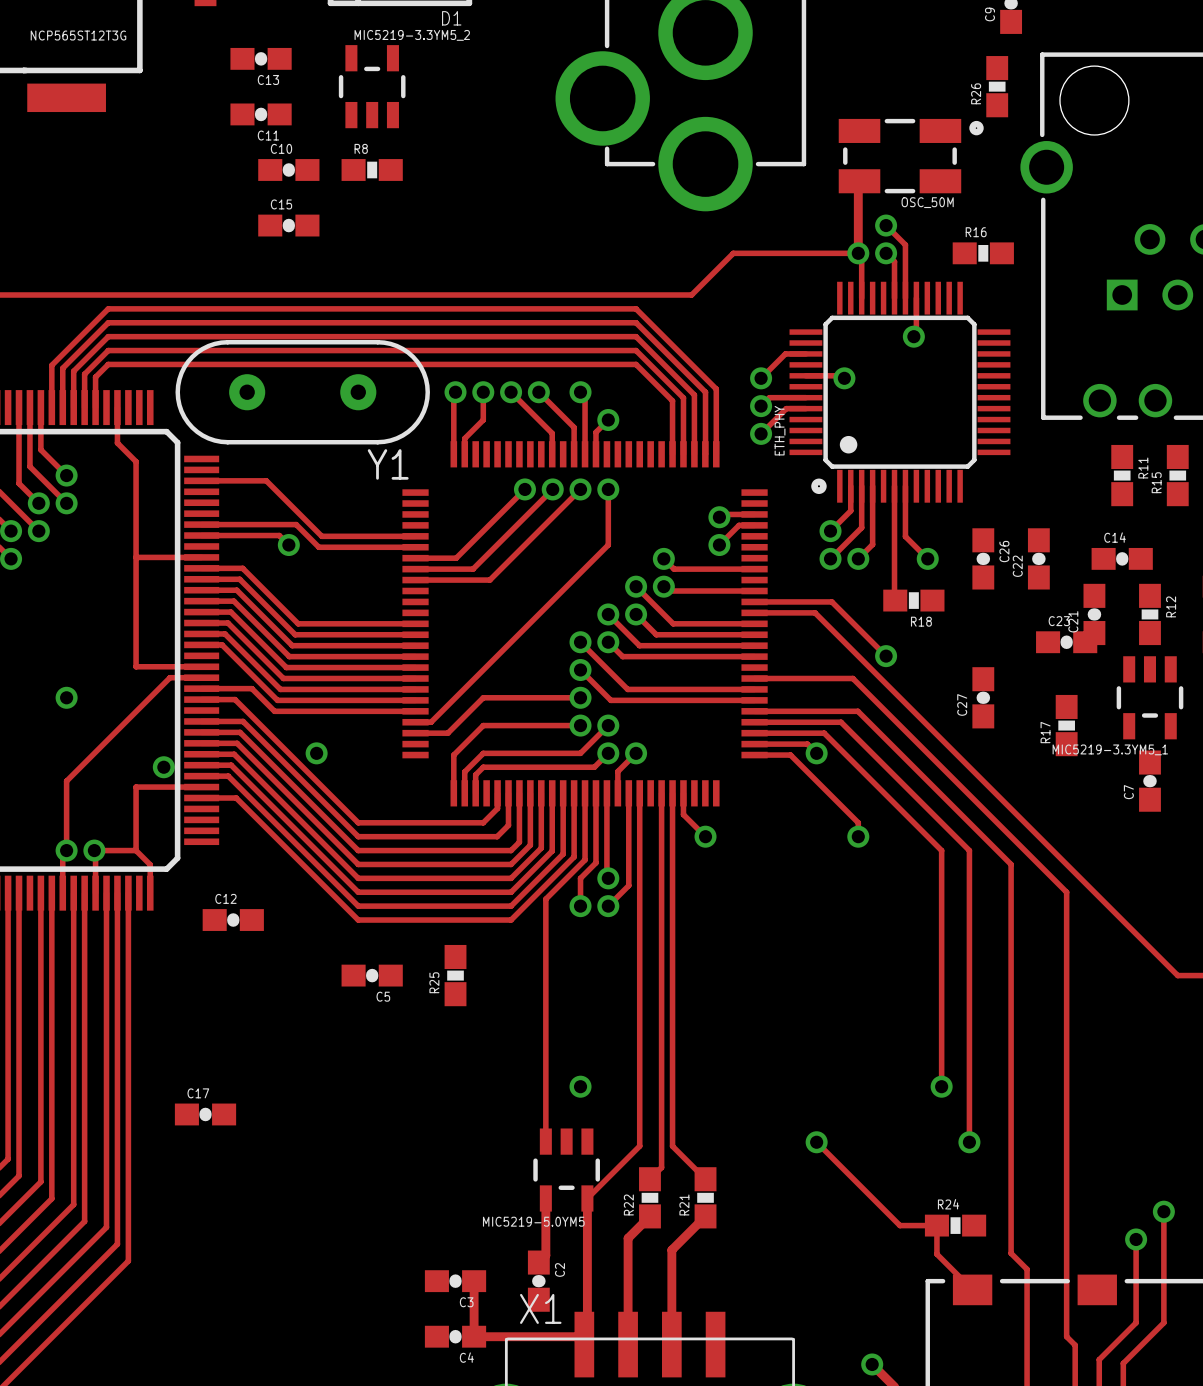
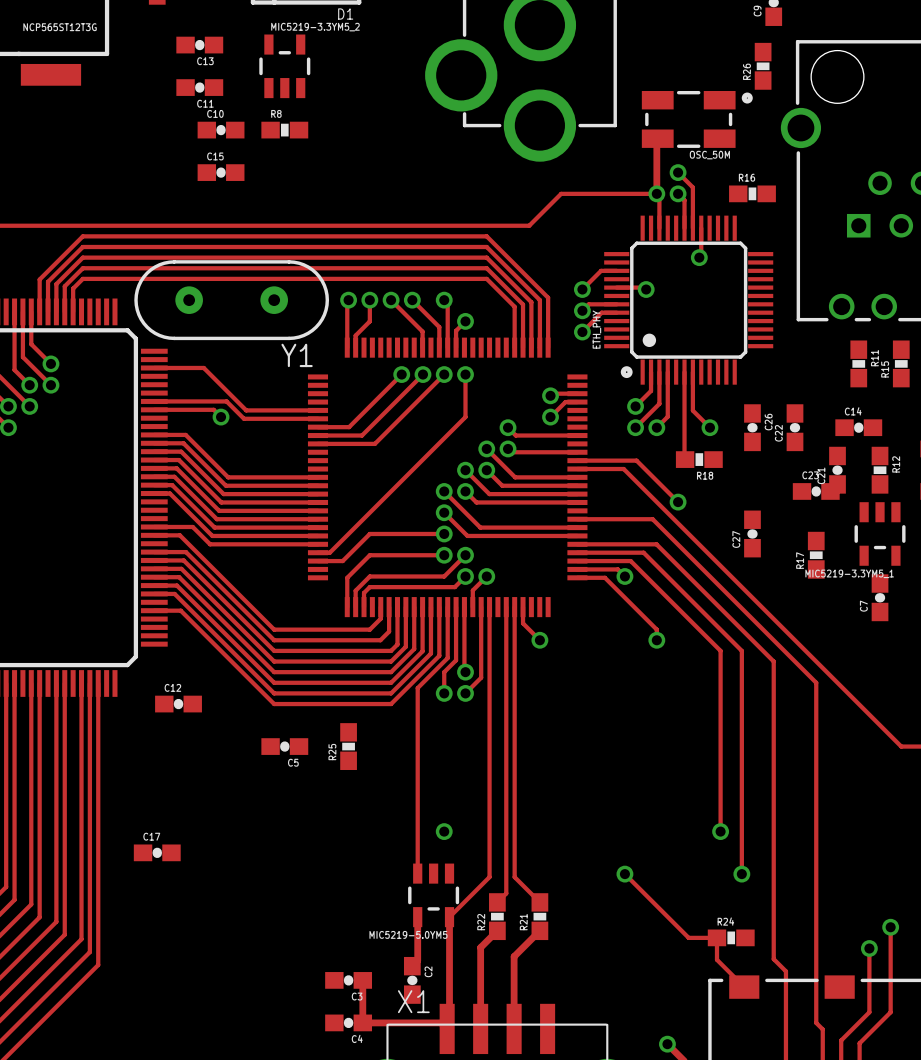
track: (117, 407) (117, 443) (136, 461) (136, 666) (201, 666) -> none
track: (136, 557) (201, 557) -> none
track: (201, 677) (170, 677) (66, 781) (66, 850) (62, 854) (62, 893) -> none
via: (66, 697) -> none
via: (316, 753) -> none
via: (163, 767) -> none
track: (201, 787) (136, 787) (136, 850) -> none
via: (66, 850) -> none
via: (94, 850) -> none
track: (136, 850) (150, 864) (150, 893) -> none
track: (136, 850) (94, 850) (95, 893) -> none

